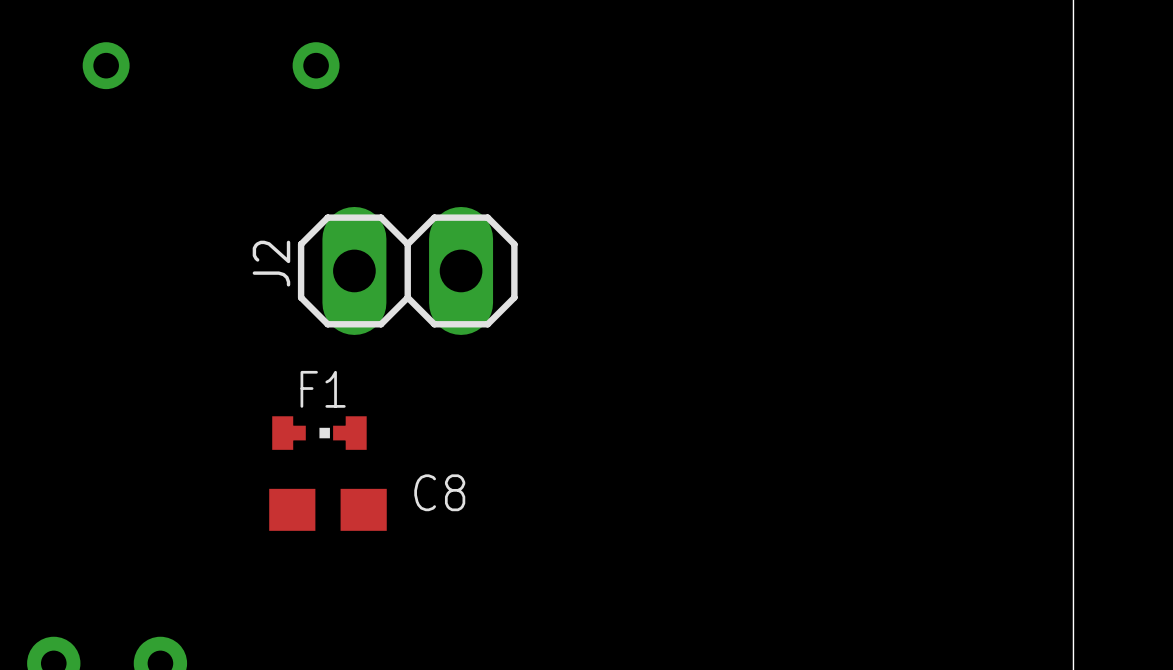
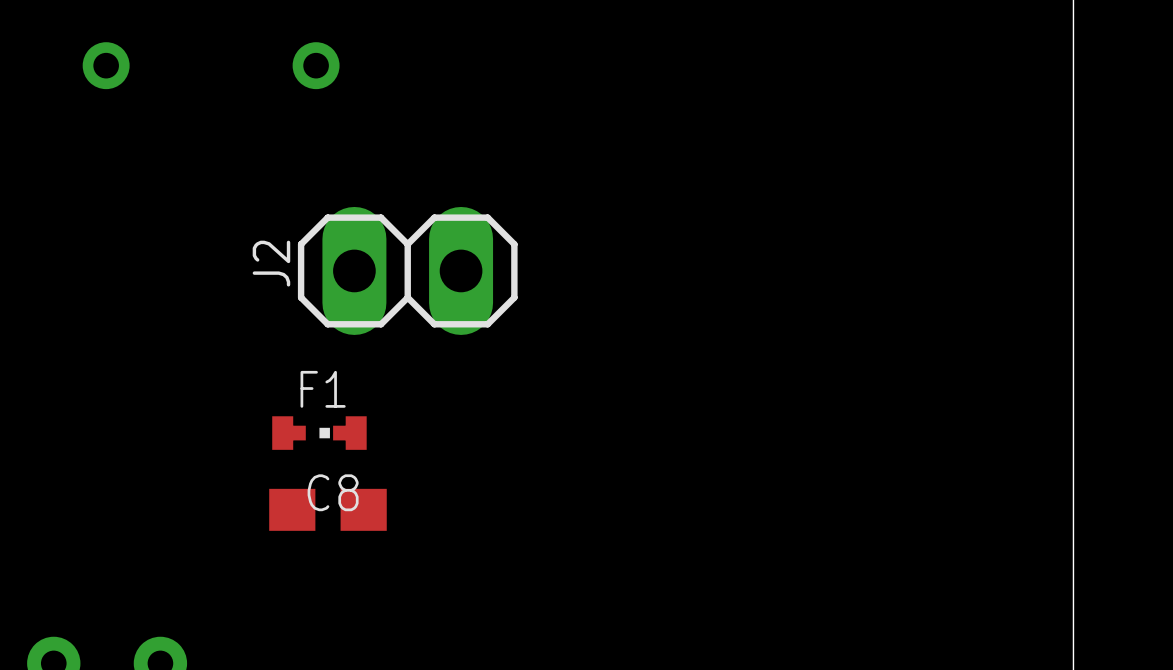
C8 name position: C8 (439, 492) -> C8 (333, 492)

